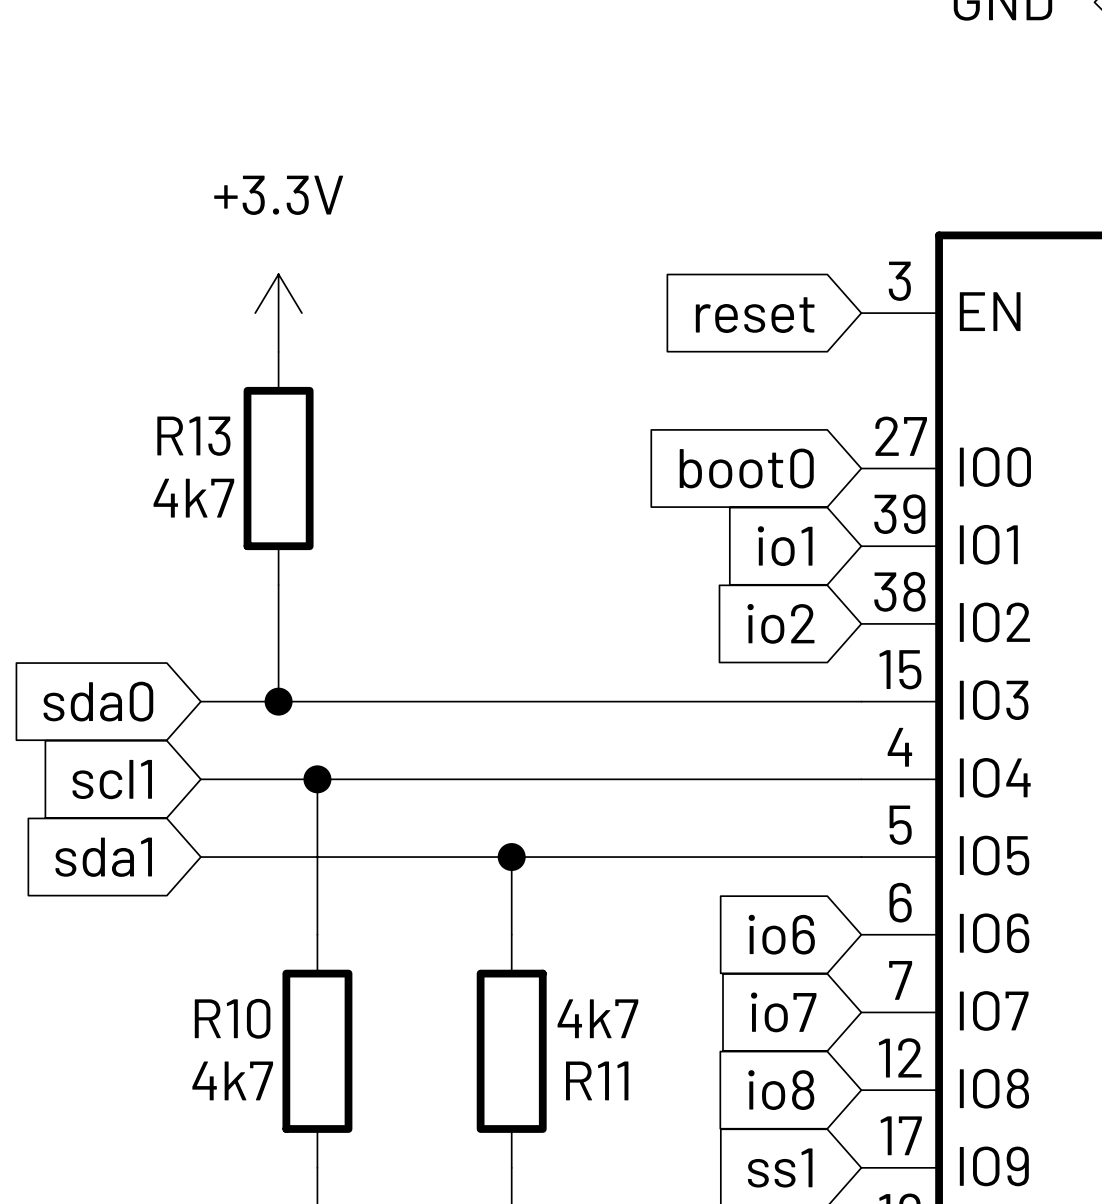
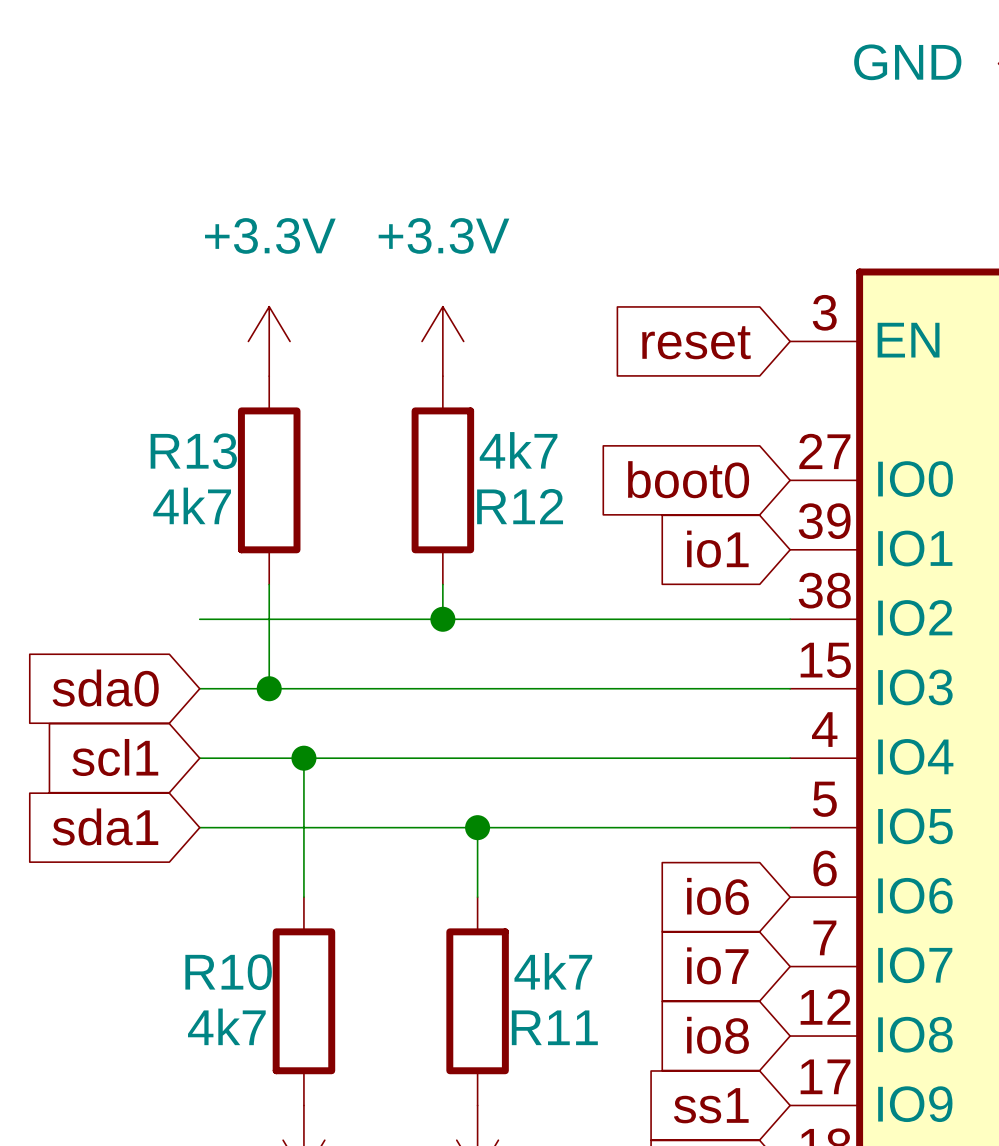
power symbol: none -> +3.3V (442, 341)
R12: none -> 4k7 (442, 480)
wire: none -> (442, 584) (442, 619)
wire: none -> (199, 619) (790, 619)
junction: none -> (442, 619)
global label: io2 (780, 623) -> none

